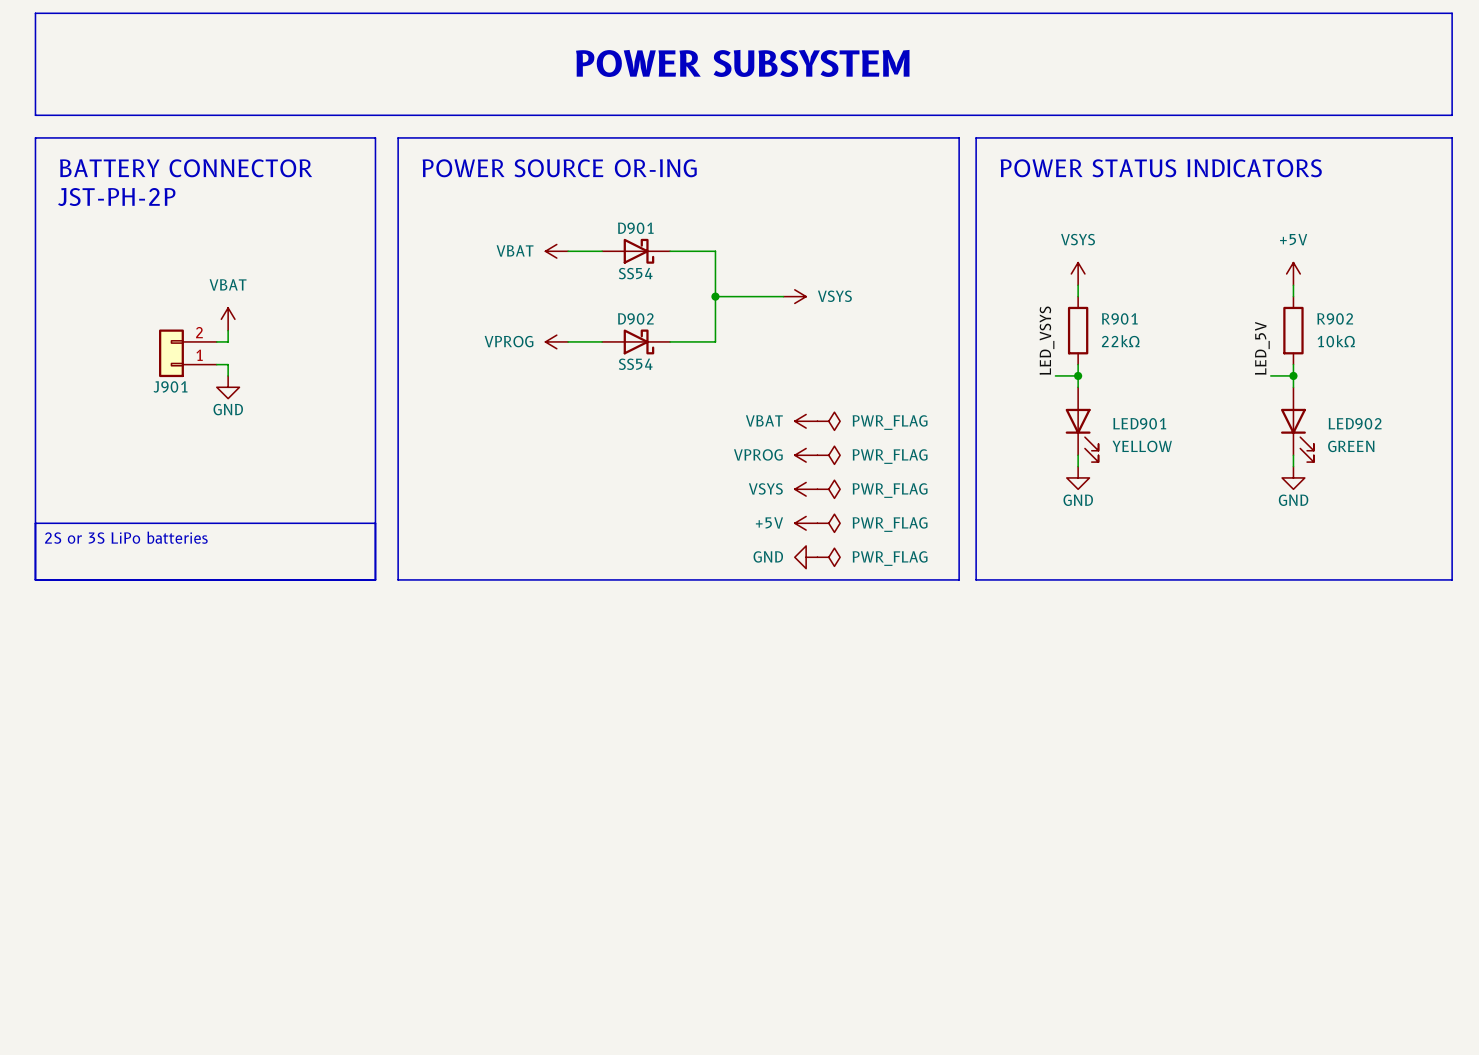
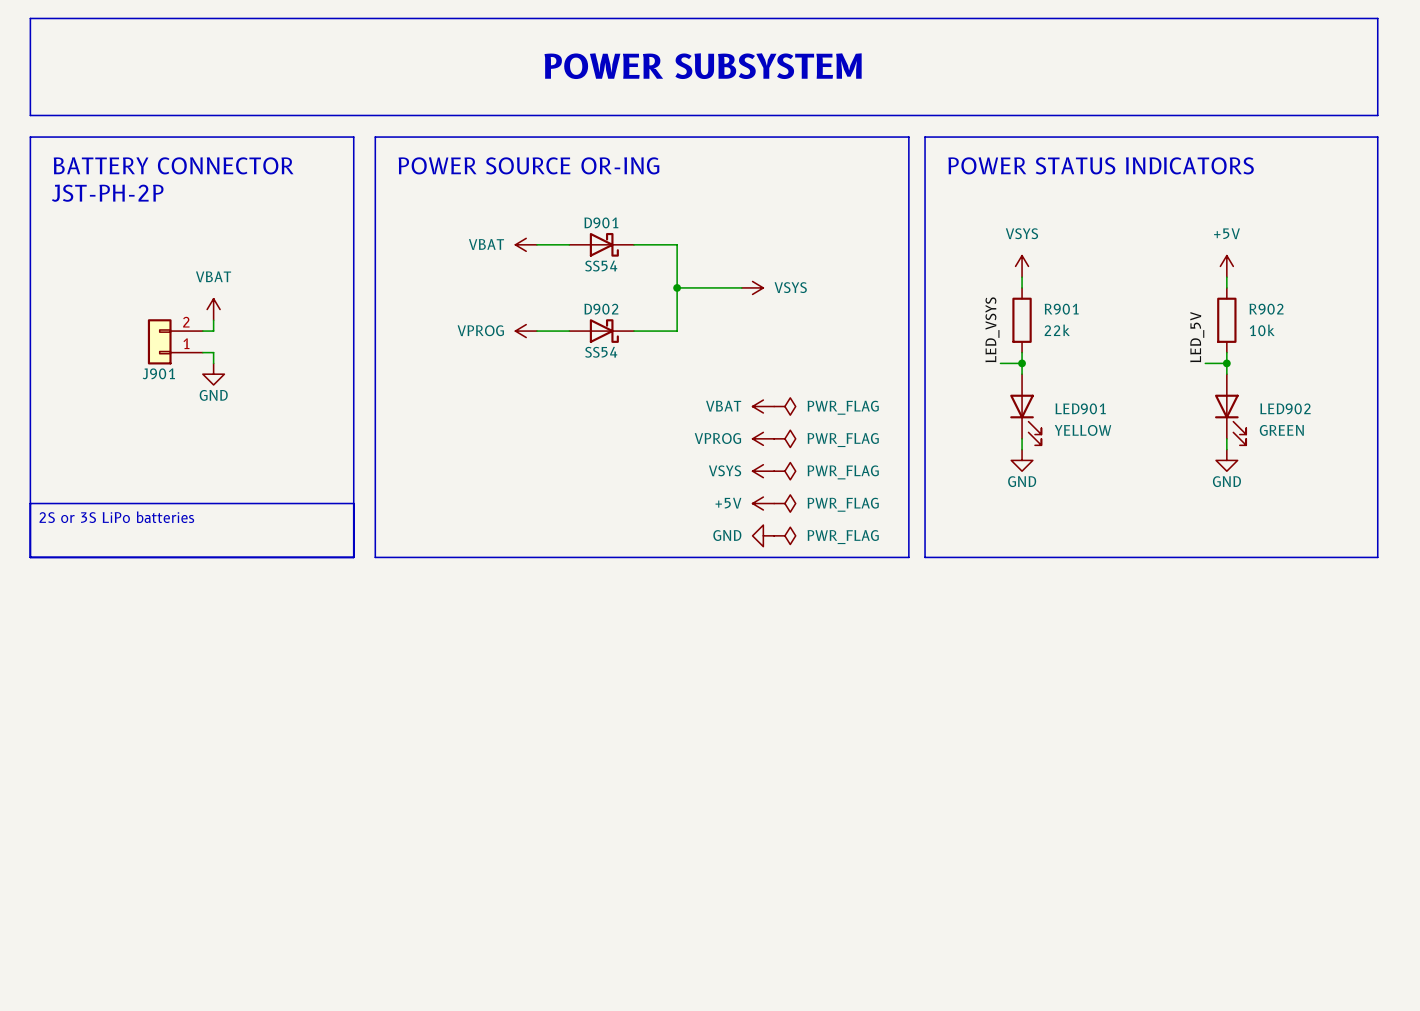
R901 value: 22kΩ (1120, 341) -> 22k (1057, 330)
R902 value: 10kΩ (1336, 341) -> 10k (1262, 330)

